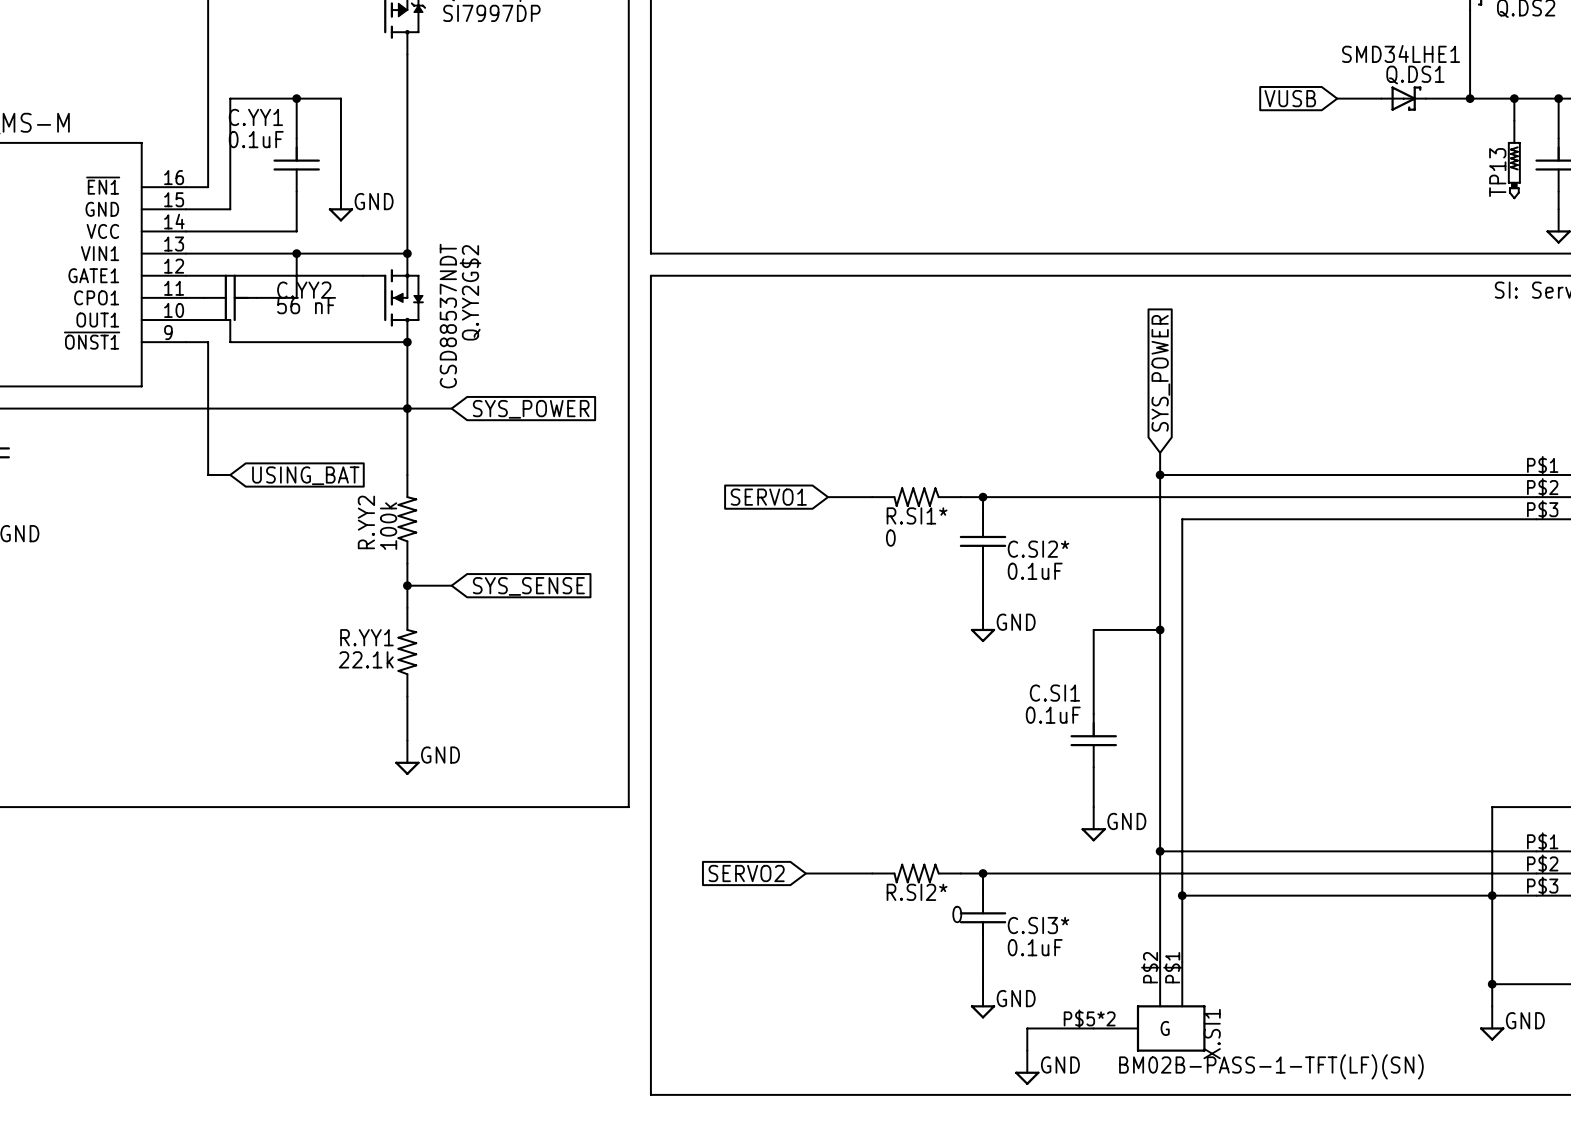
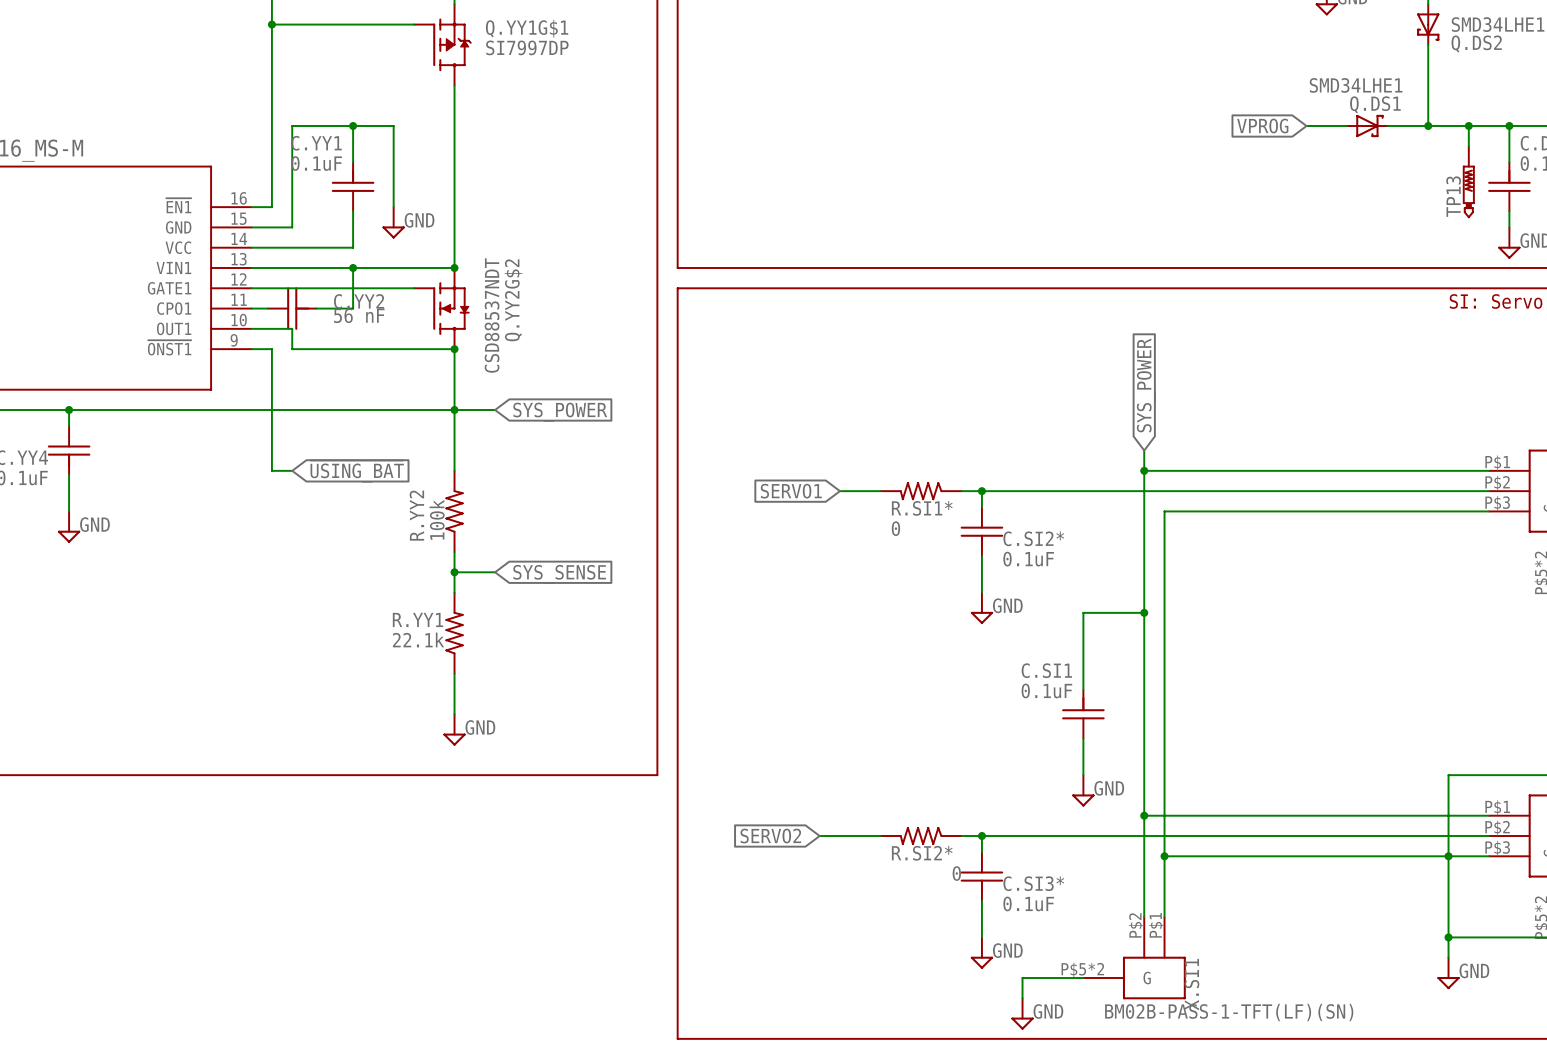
global label: VUSB (1290, 98) -> VPROG (1262, 126)
global label: USING_BAT (305, 475) -> ~{USING_BAT} (357, 471)

